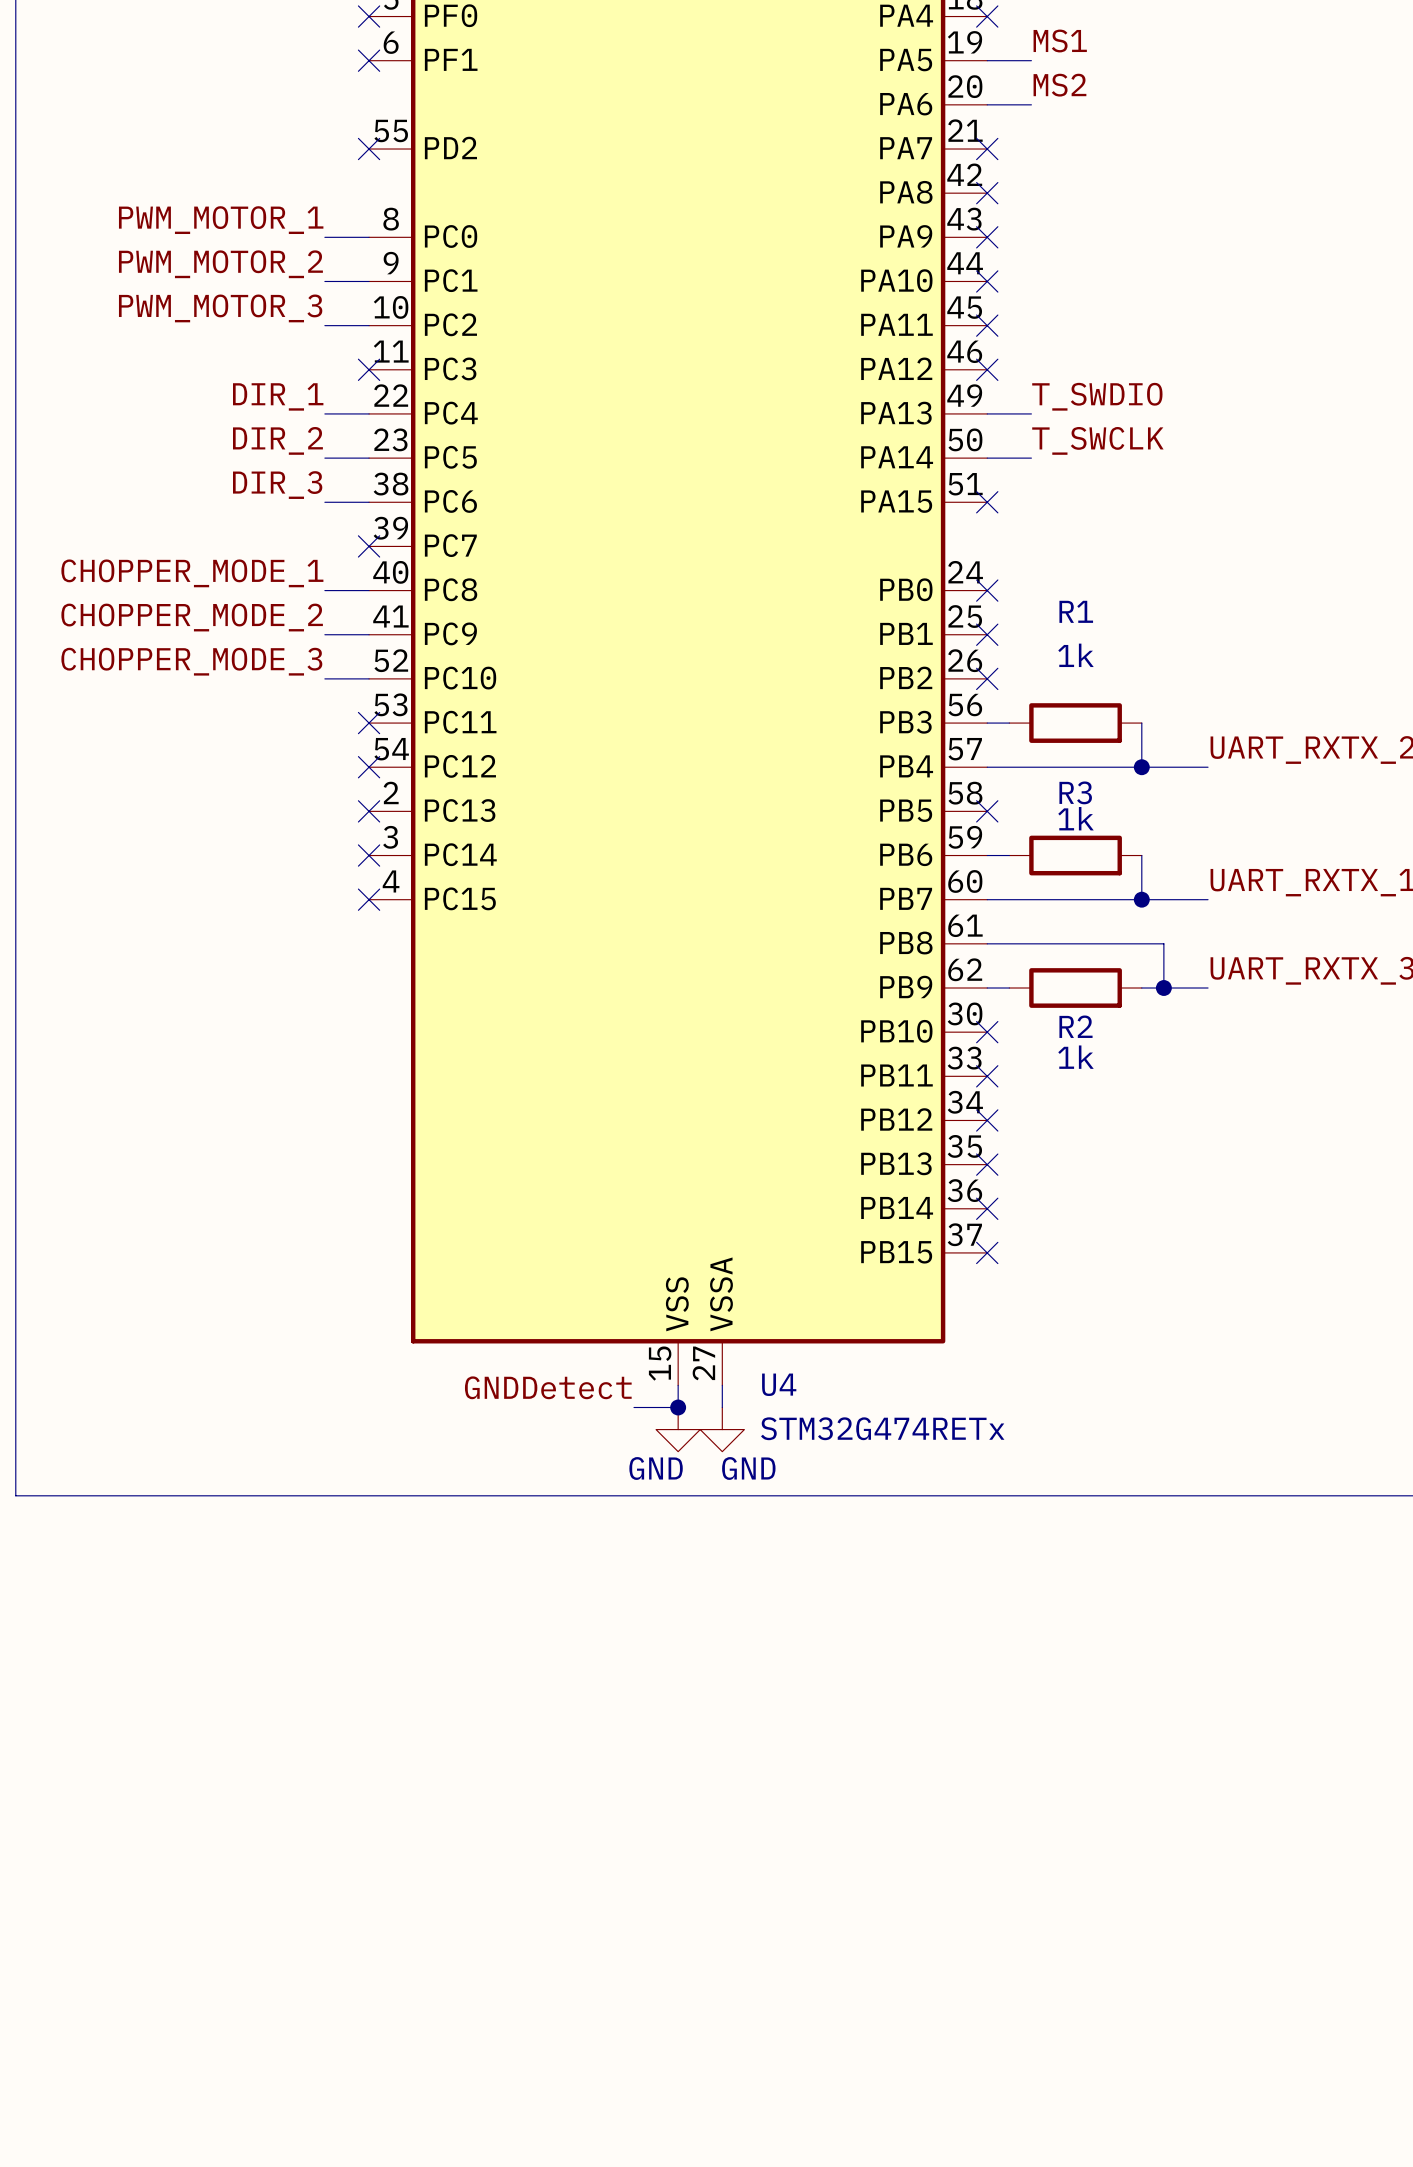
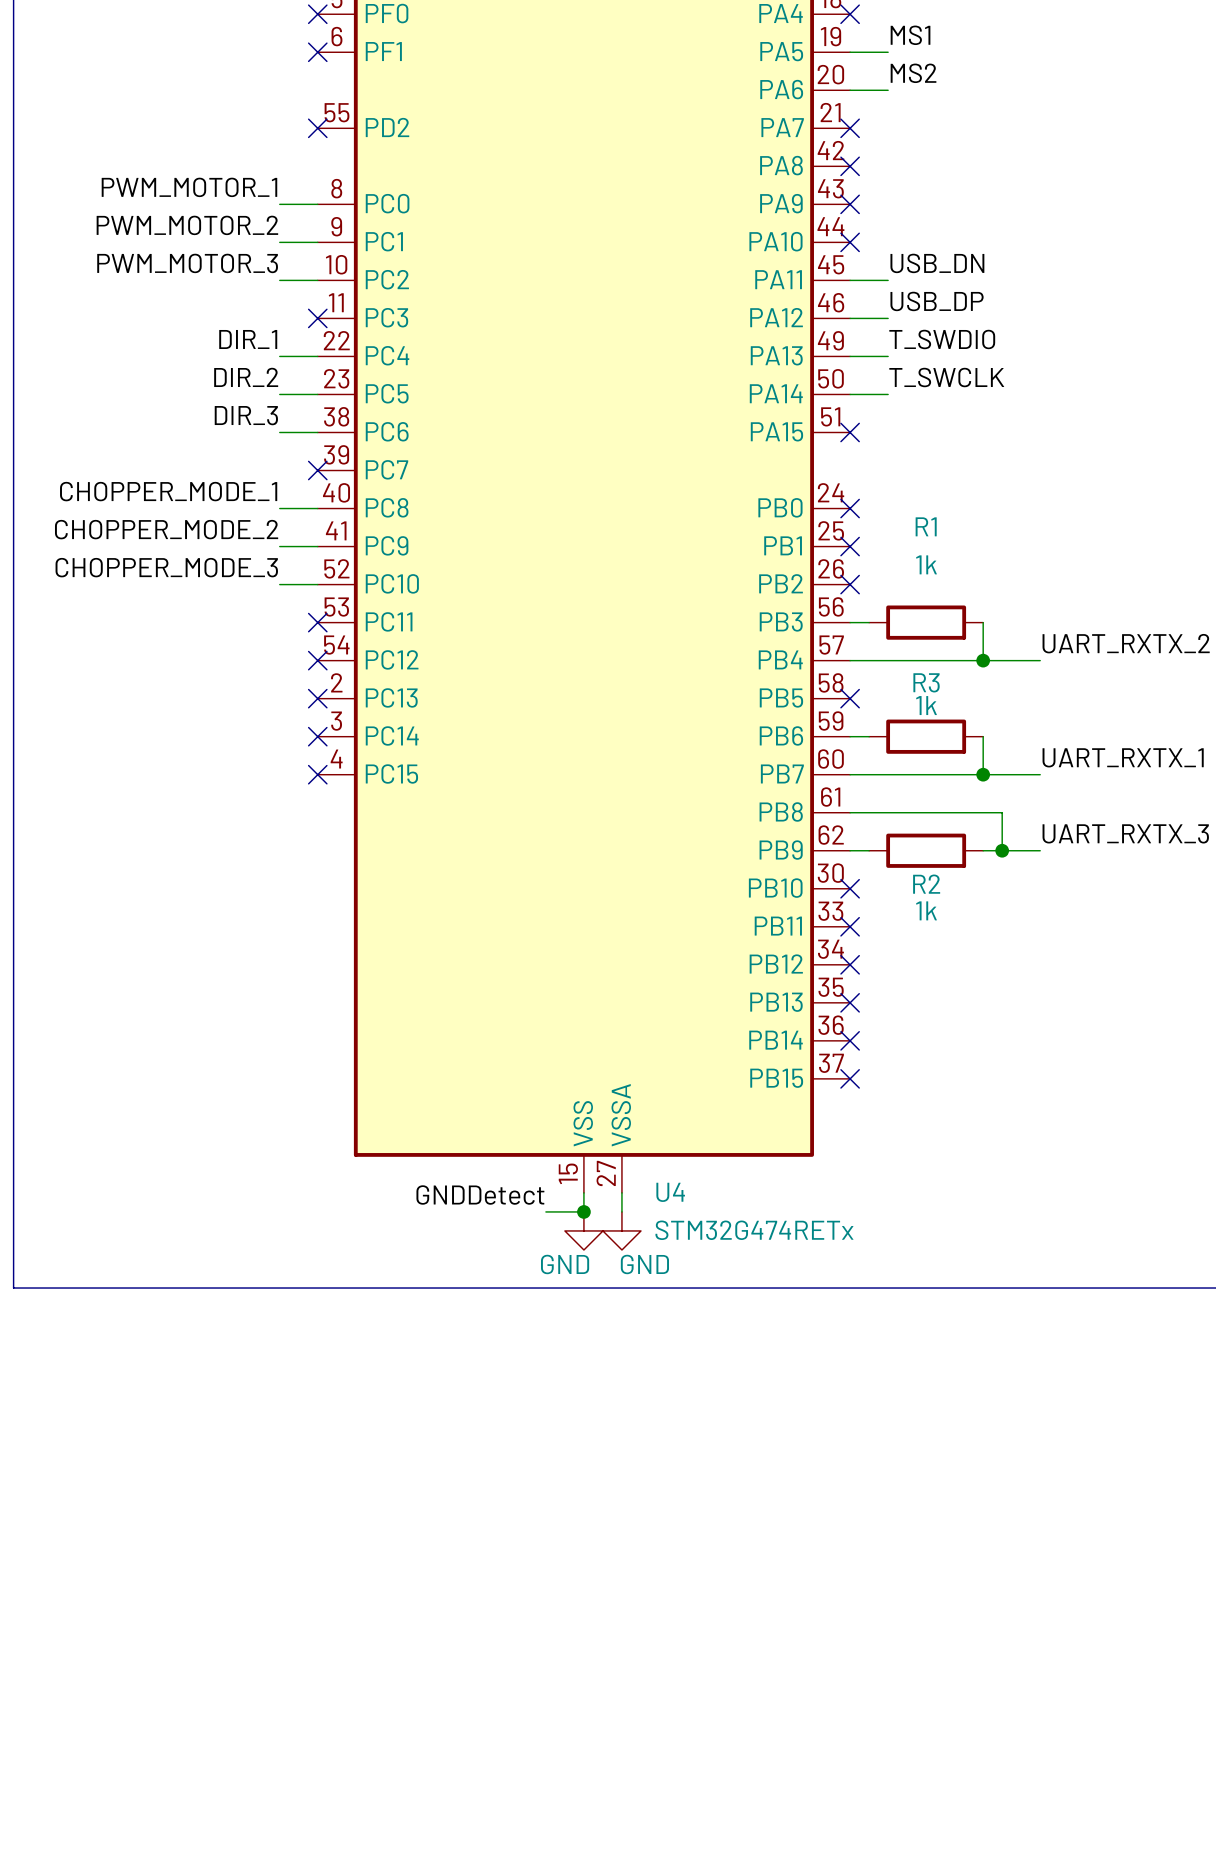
label: none -> USB_DN (937, 263)
wire: none -> (850, 280) (888, 280)
no-connect mark: (987, 325) -> none
label: none -> USB_DP (937, 301)
wire: none -> (850, 318) (888, 318)
no-connect mark: (987, 369) -> none

